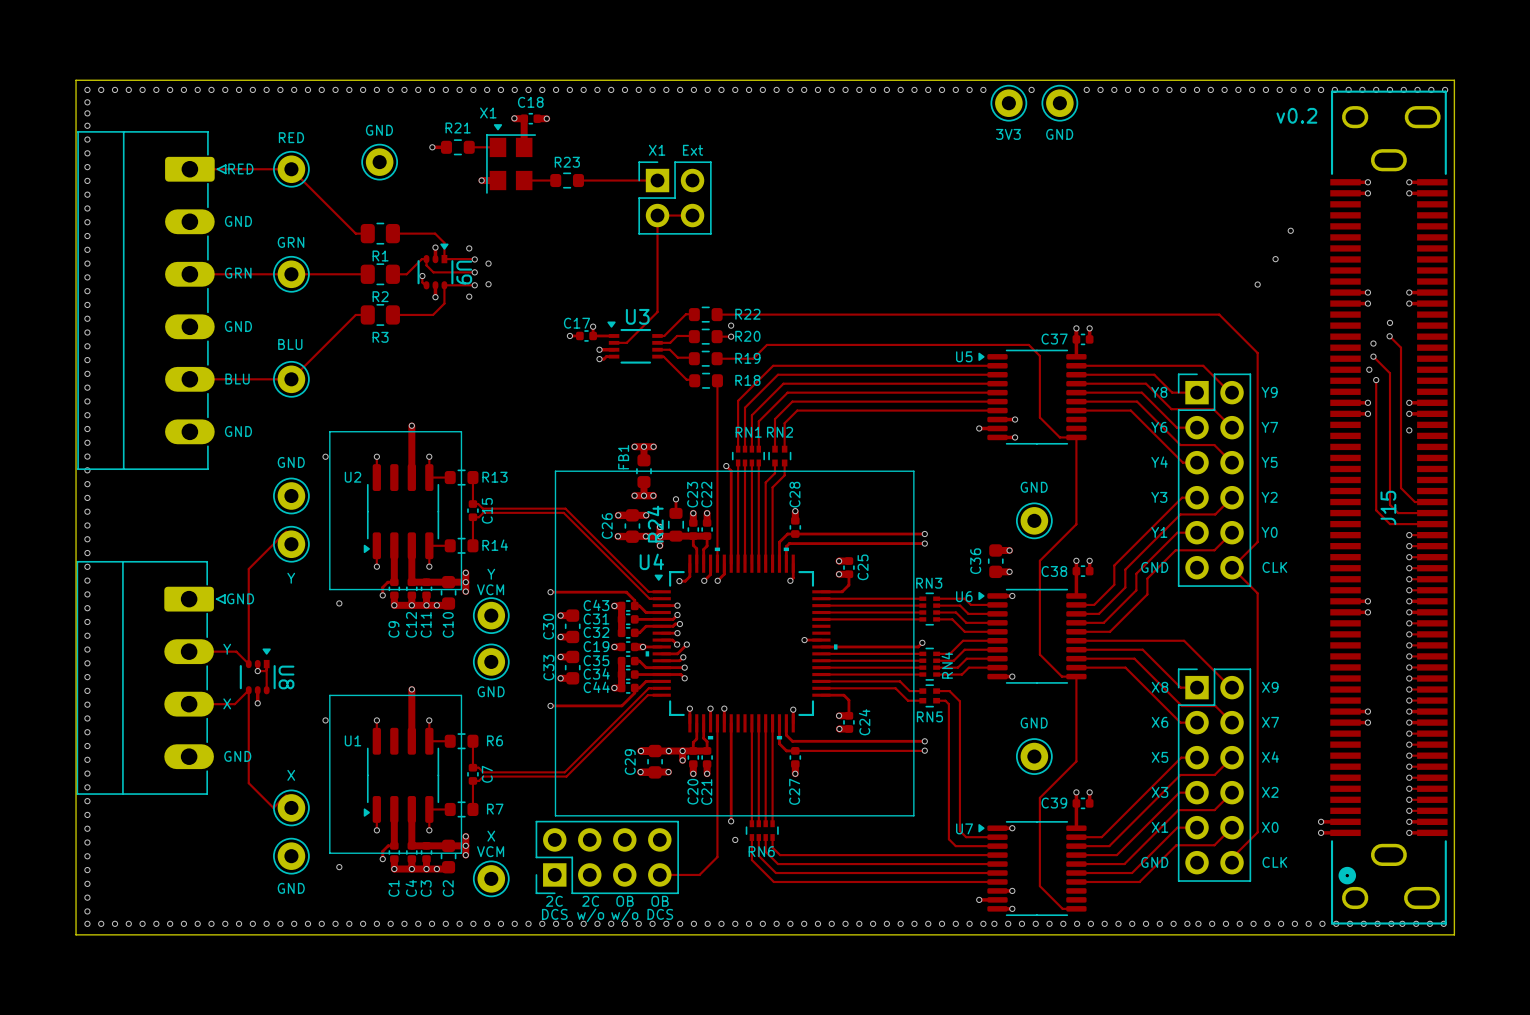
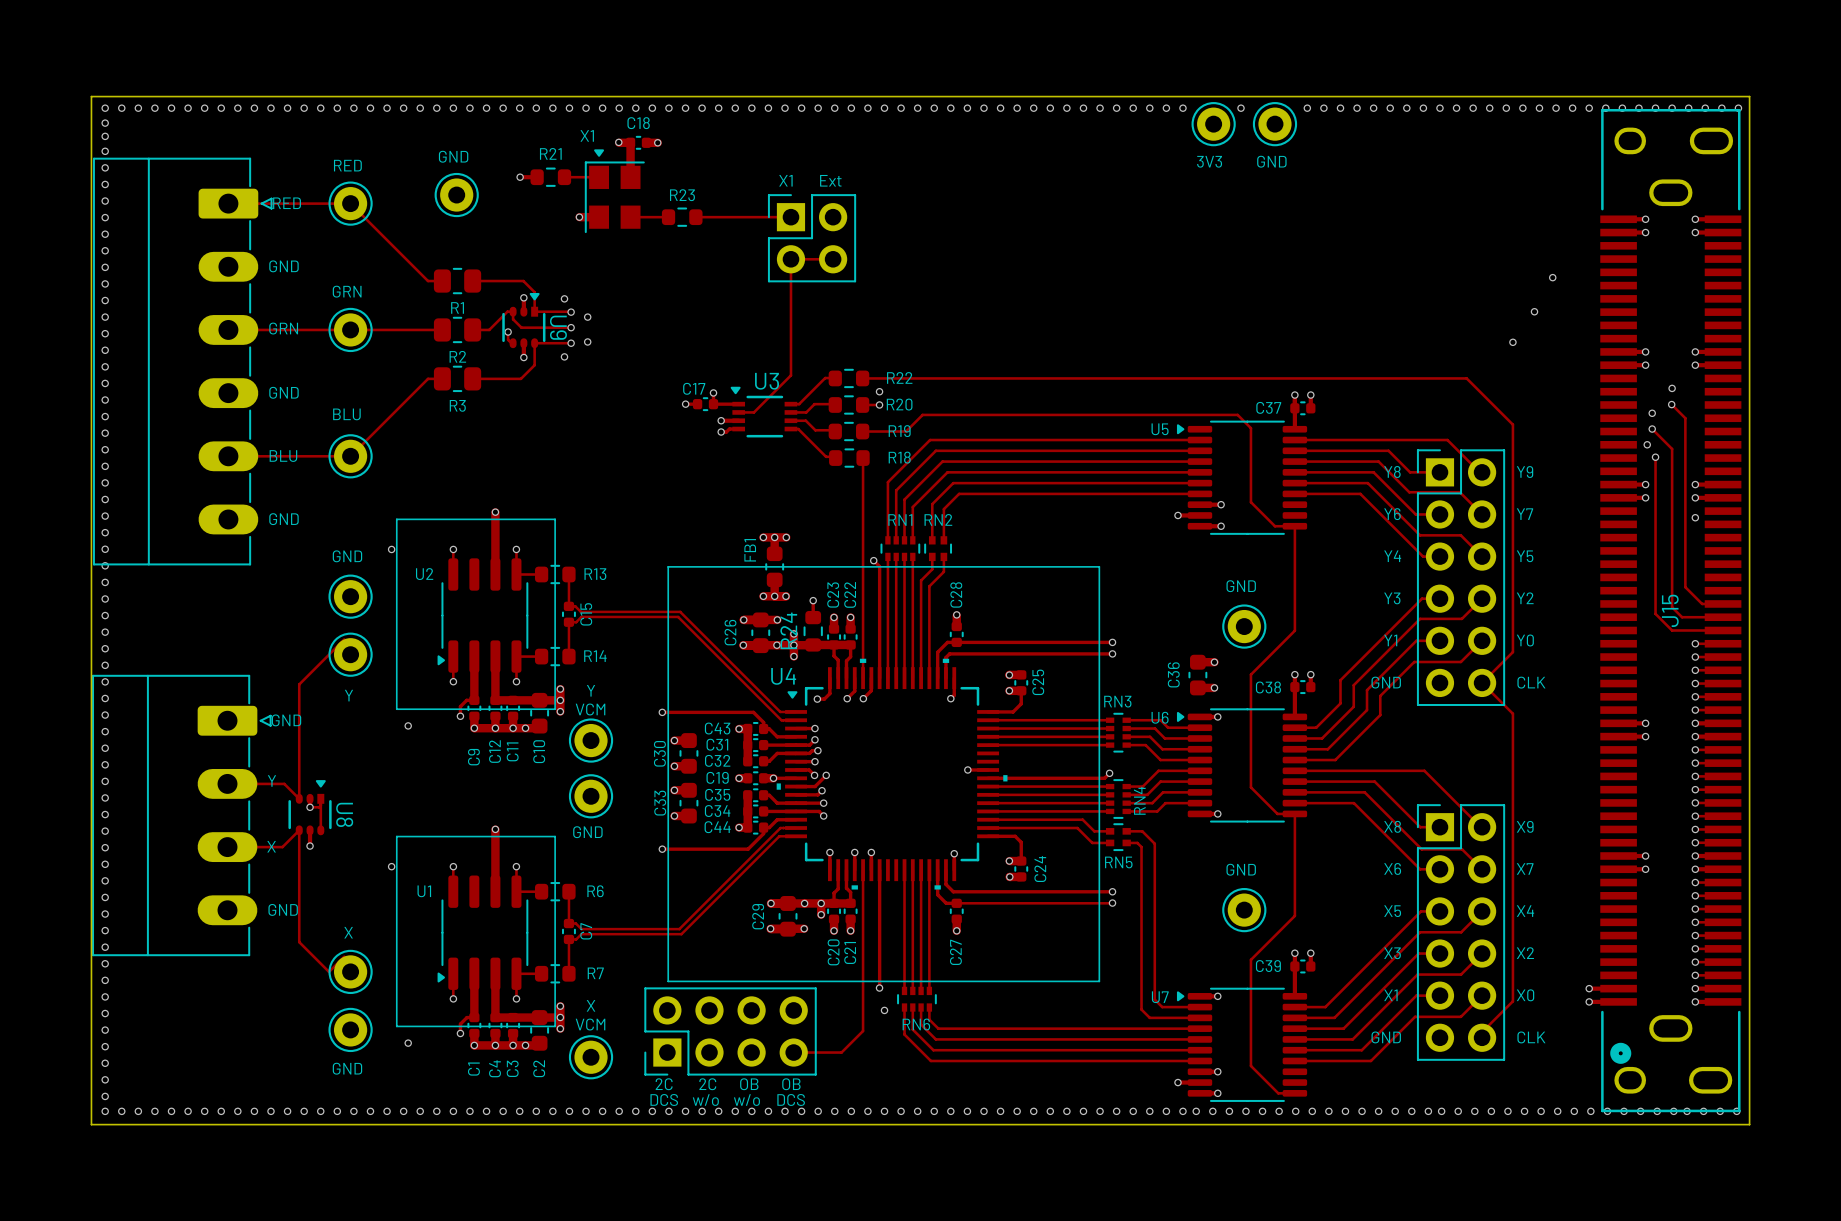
text: v0.2 (1296, 115) -> none

